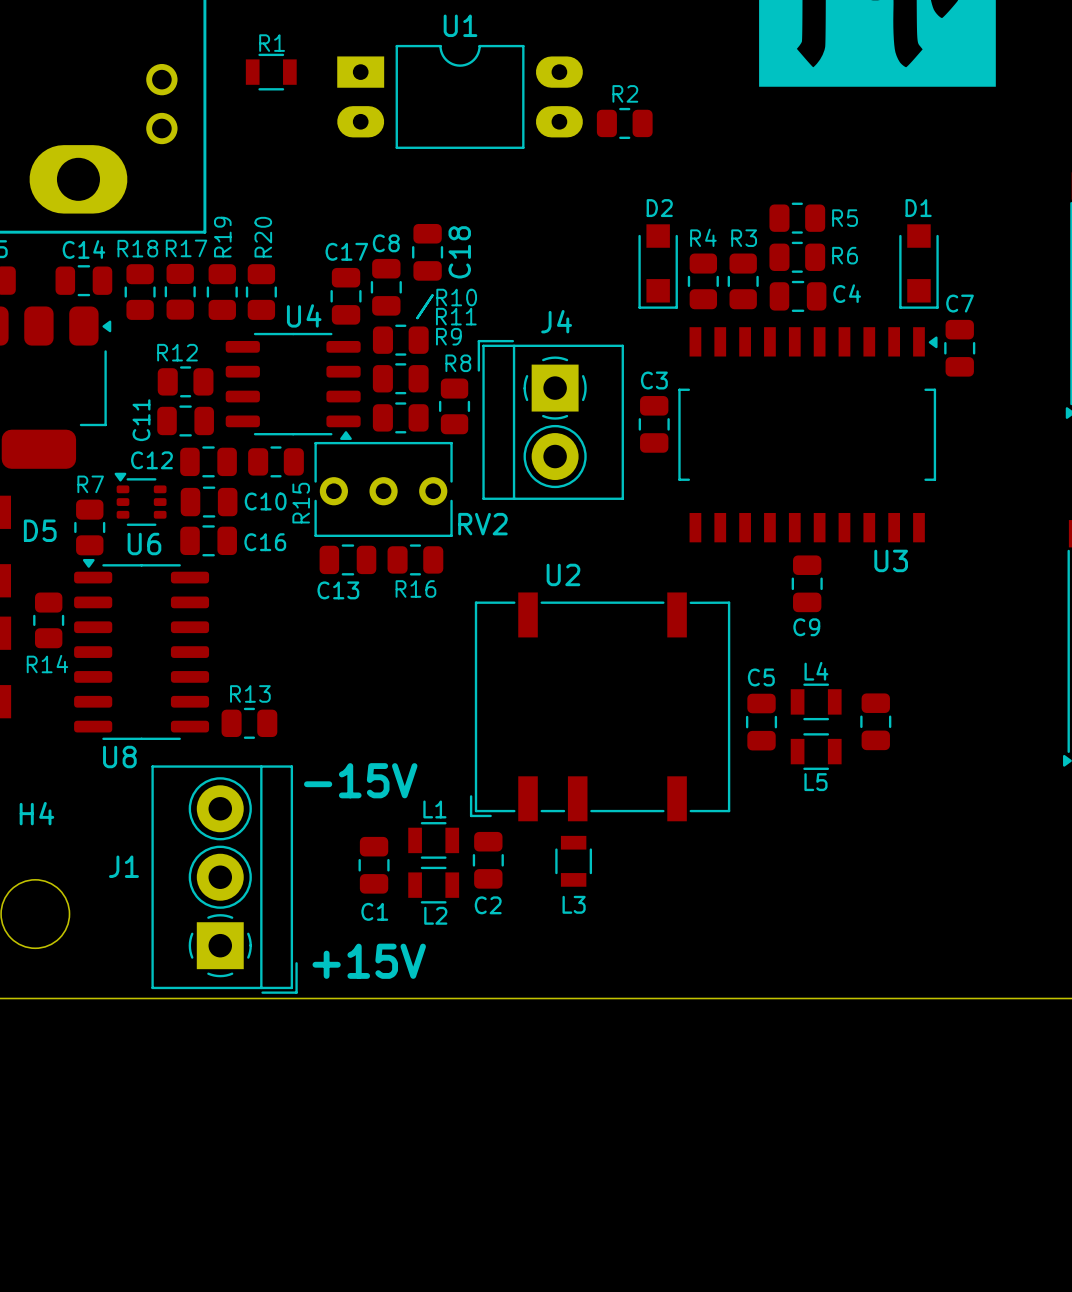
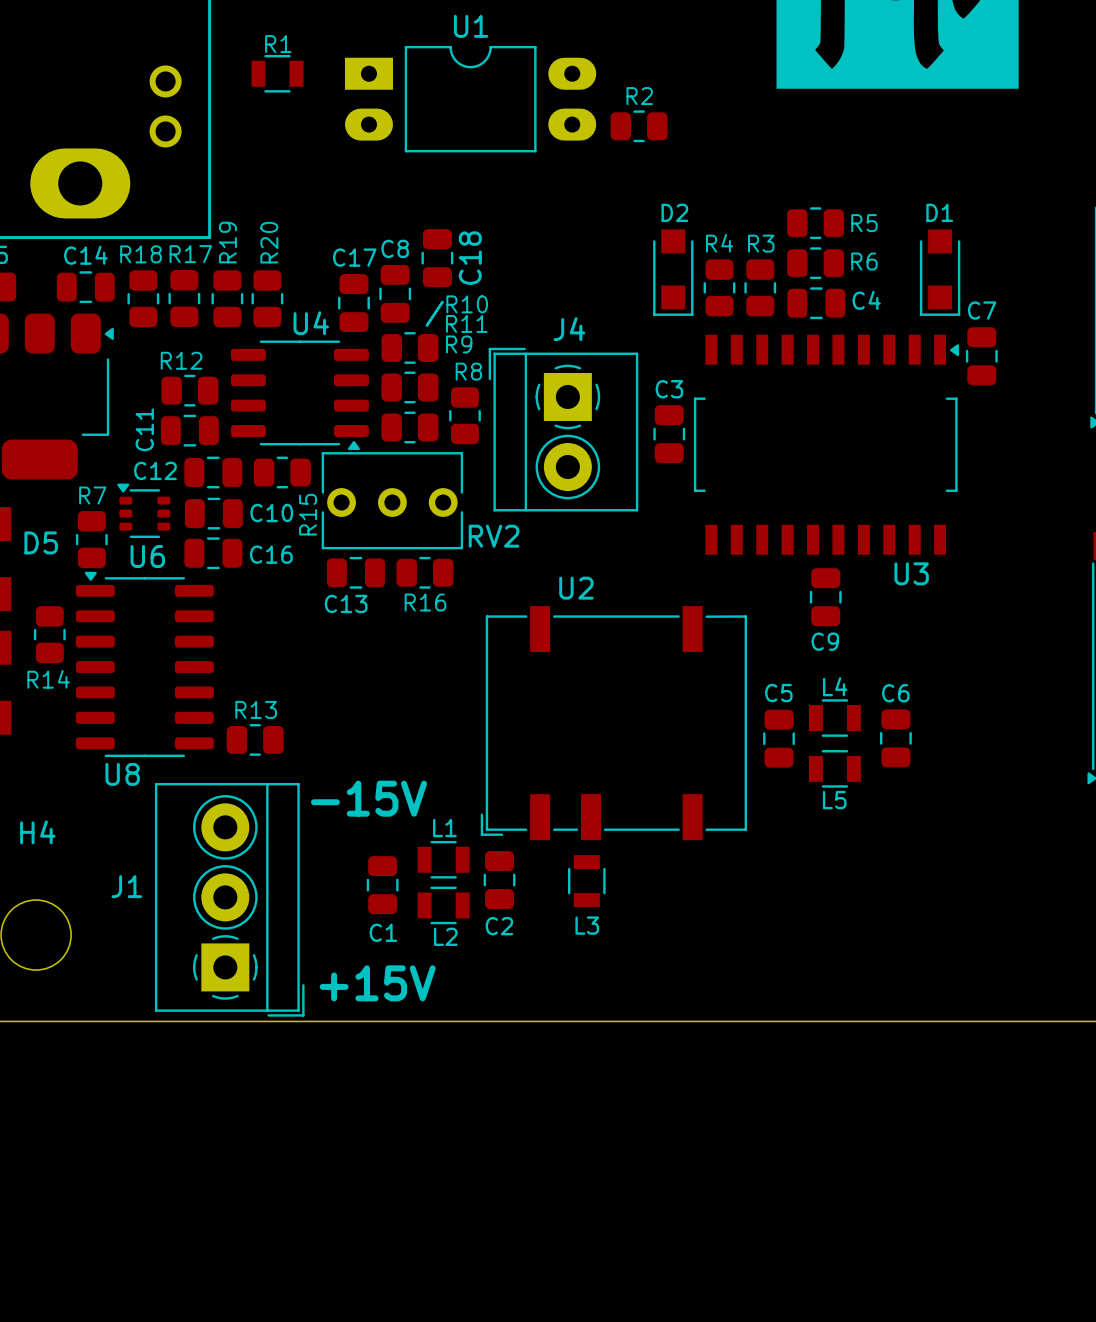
C6 name: none -> C6 (895, 693)

